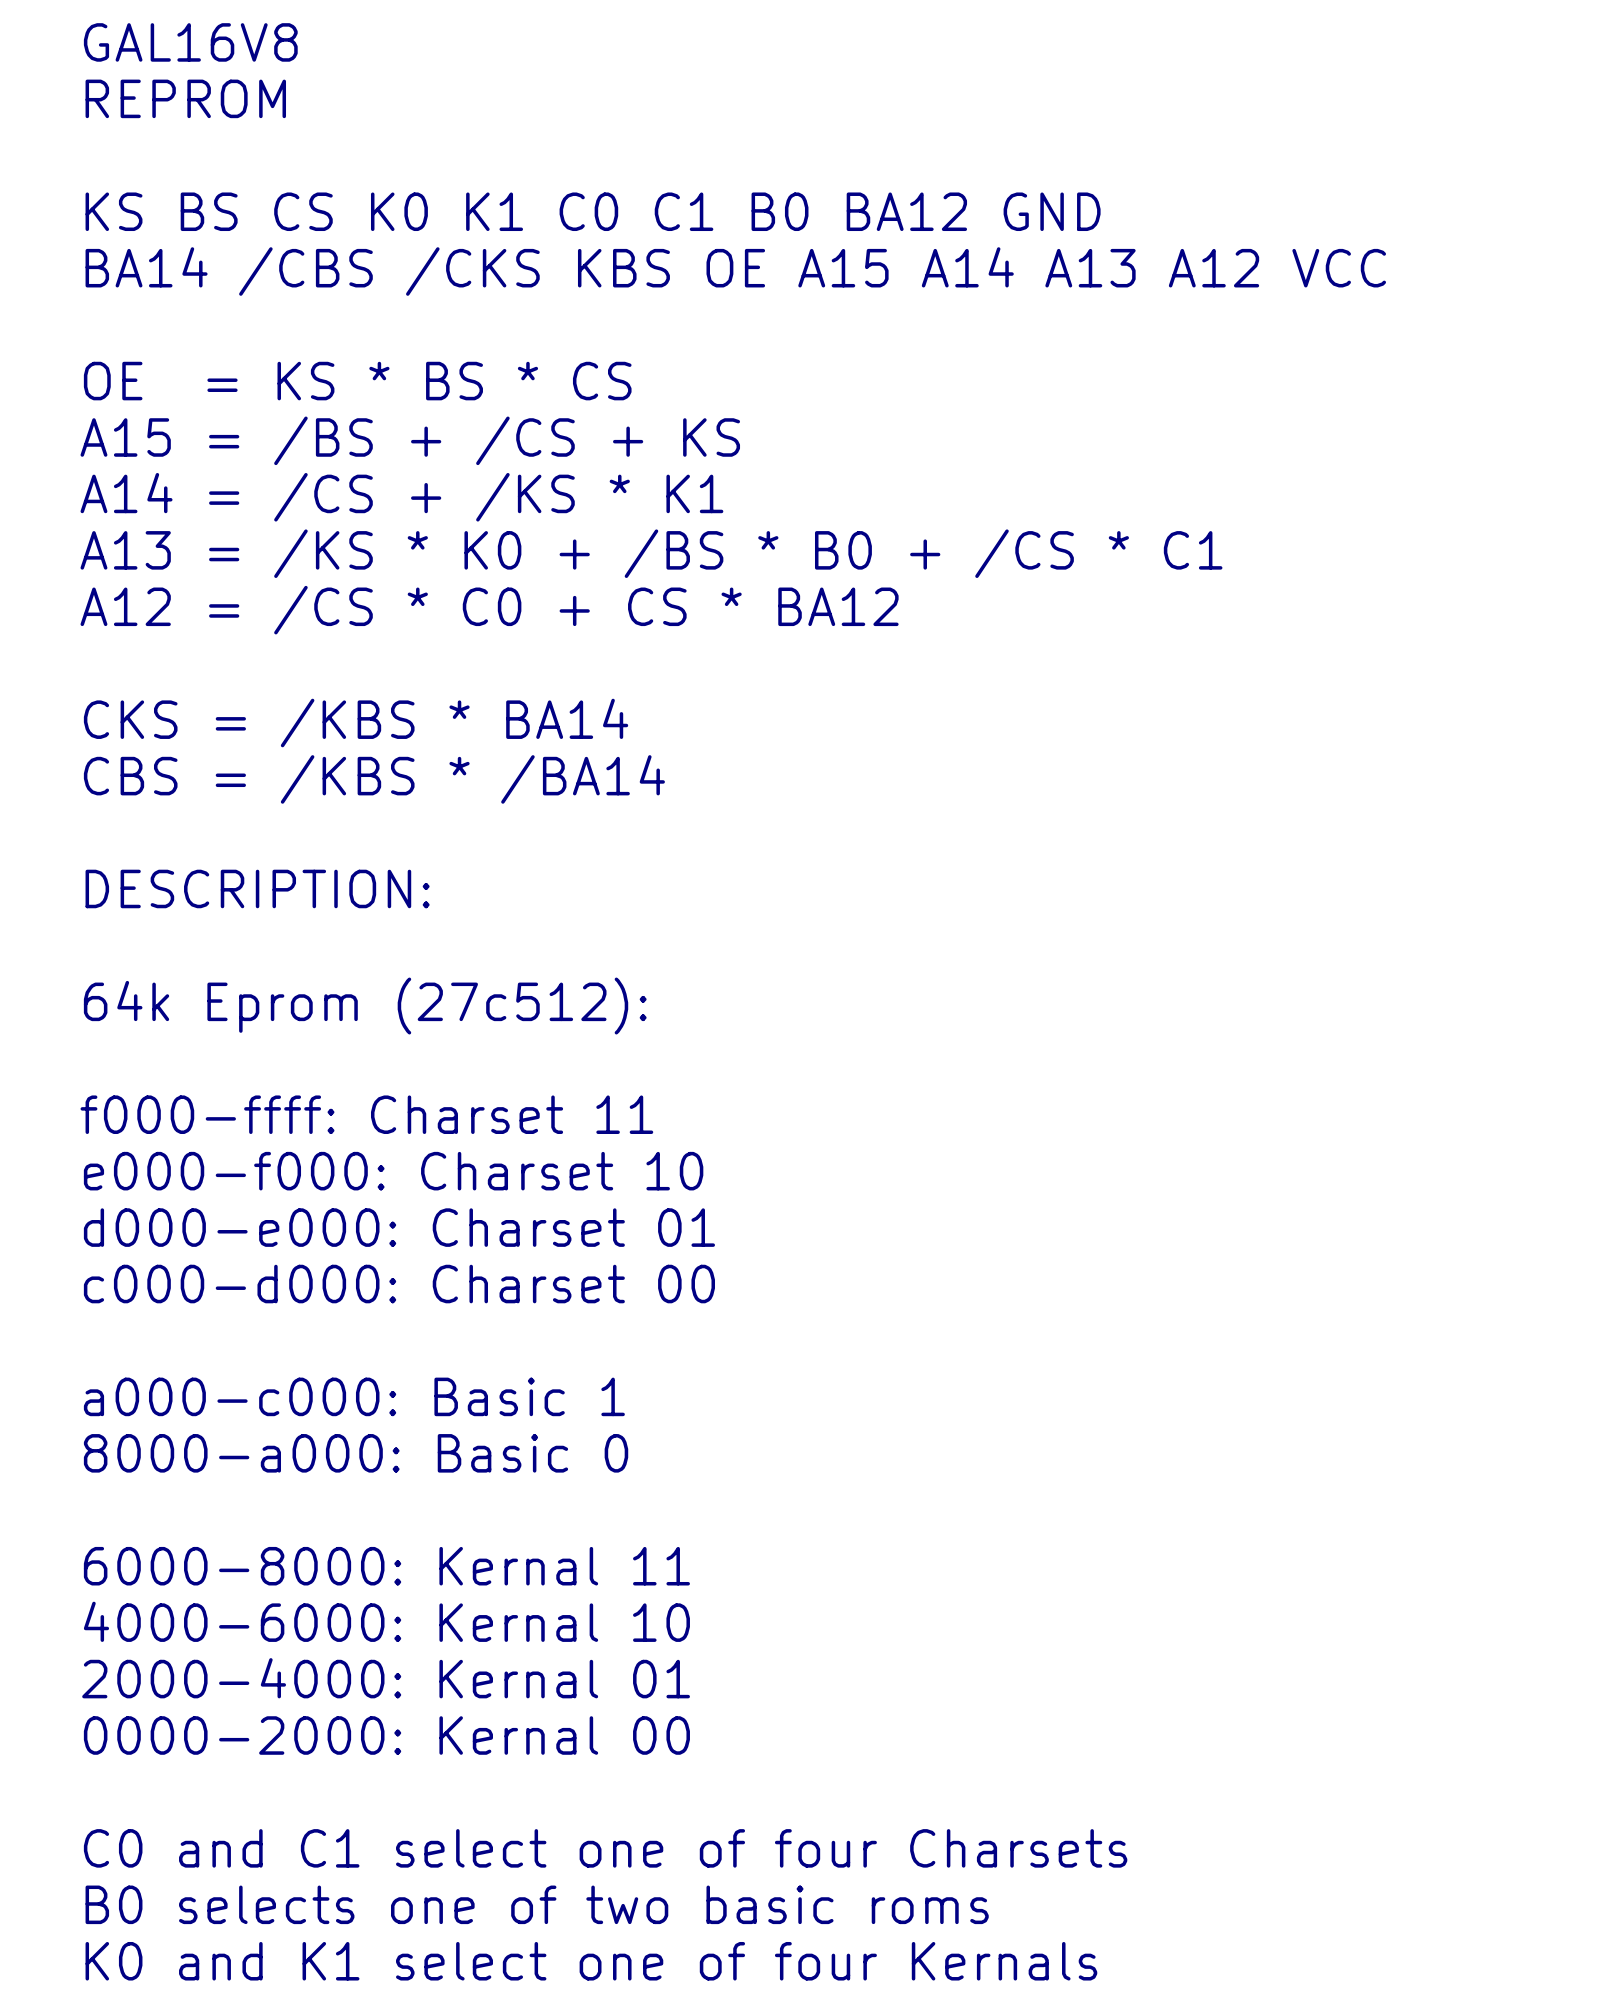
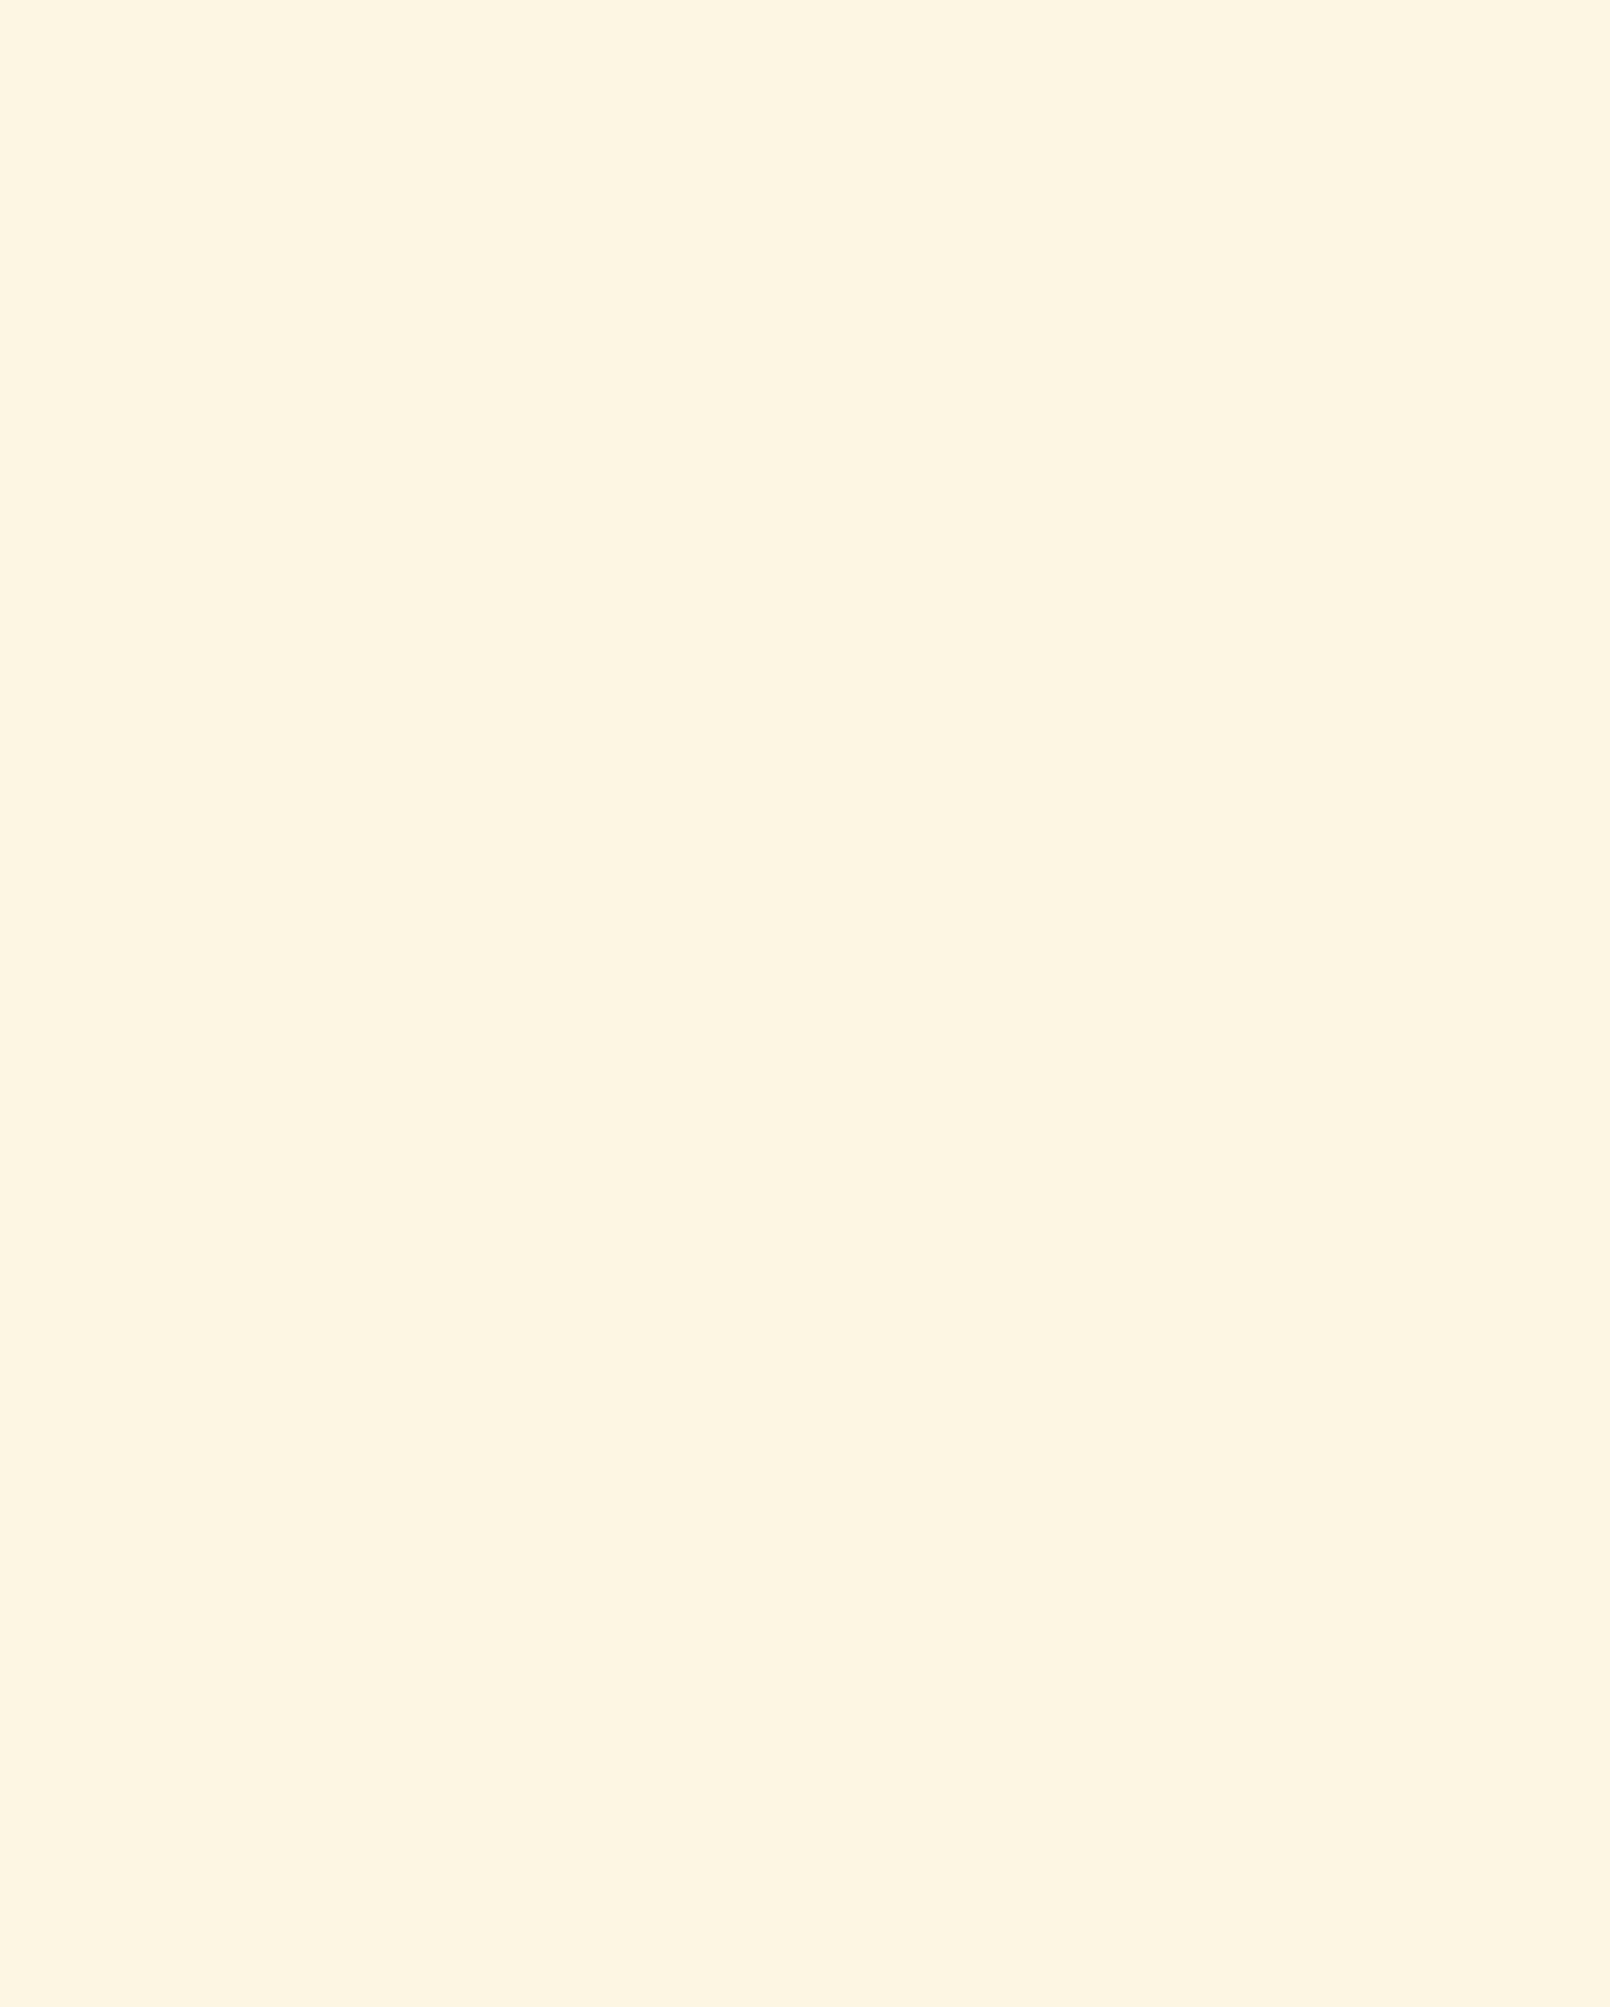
text: GAL16V8 (190, 42) -> none
text: REPROM (185, 98) -> none
text: KS BS CS K0 K1 C0 C1 B0 BA12 GND (593, 211) -> none
text: BA14 /CBS /CKS KBS OE A15 A14 A13 A12 VCC (735, 271) -> none
text: OE = KS * BS * CS (357, 381) -> none
text: A15 = /BS + /CS + KS (410, 440) -> none
text: A14 = /CS + /KS * K1 (401, 497) -> none
text: A13 = /KS * K0 + /BS * B0 + /CS * C1 (651, 553) -> none
text: A12 = /CS * C0 + CS * BA12 (489, 610) -> none
text: CKS = /KBS * BA14 (356, 723) -> none
text: CBS = /KBS * /BA14 (374, 779) -> none
text: DESCRIPTION: (257, 888) -> none
text: 64k Eprom (27c512): (365, 1006) -> none
text: f000-ffff: Charset 11 (366, 1114) -> none
text: e000-f000: Charset 10 (393, 1171) -> none
text: d000-e000: Charset 01 (399, 1227) -> none
text: c000-d000: Charset 00 (399, 1284) -> none
text: a000-c000: Basic 1 (354, 1396) -> none
text: 8000-a000: Basic 0 (356, 1453) -> none
text: 6000-8000: Kernal 11 (386, 1566) -> none
text: 4000-6000: Kernal 10 (386, 1621) -> none
text: 2000-4000: Kernal 01 (386, 1678) -> none
text: 0000-2000: Kernal 00 (386, 1735) -> none
text: C0 and C1 select one of four Charsets (605, 1848) -> none
text: B0 selects one of two basic roms (537, 1904) -> none
text: K0 and K1 select one of four Kernals (591, 1961) -> none

